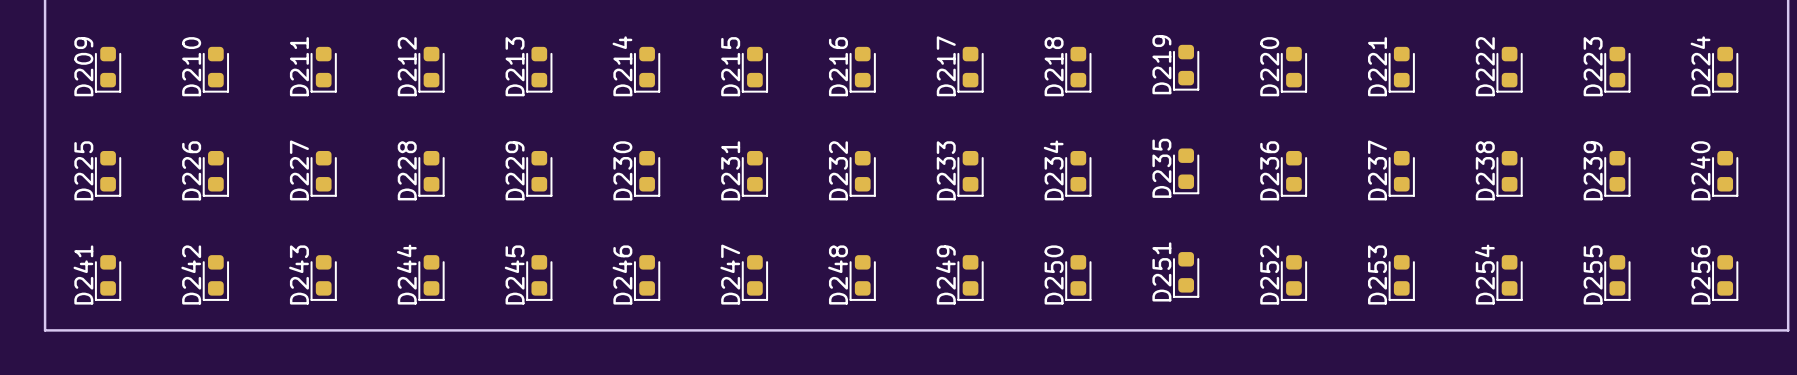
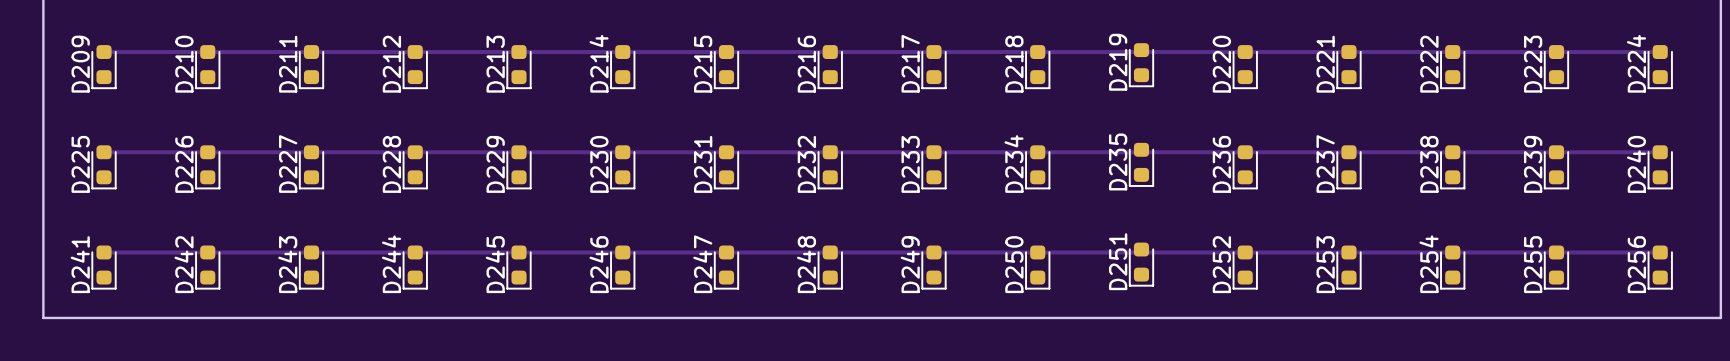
track: none -> (107, 52) (1660, 52)
track: none -> (104, 152) (1660, 152)
track: none -> (104, 252) (1660, 252)

